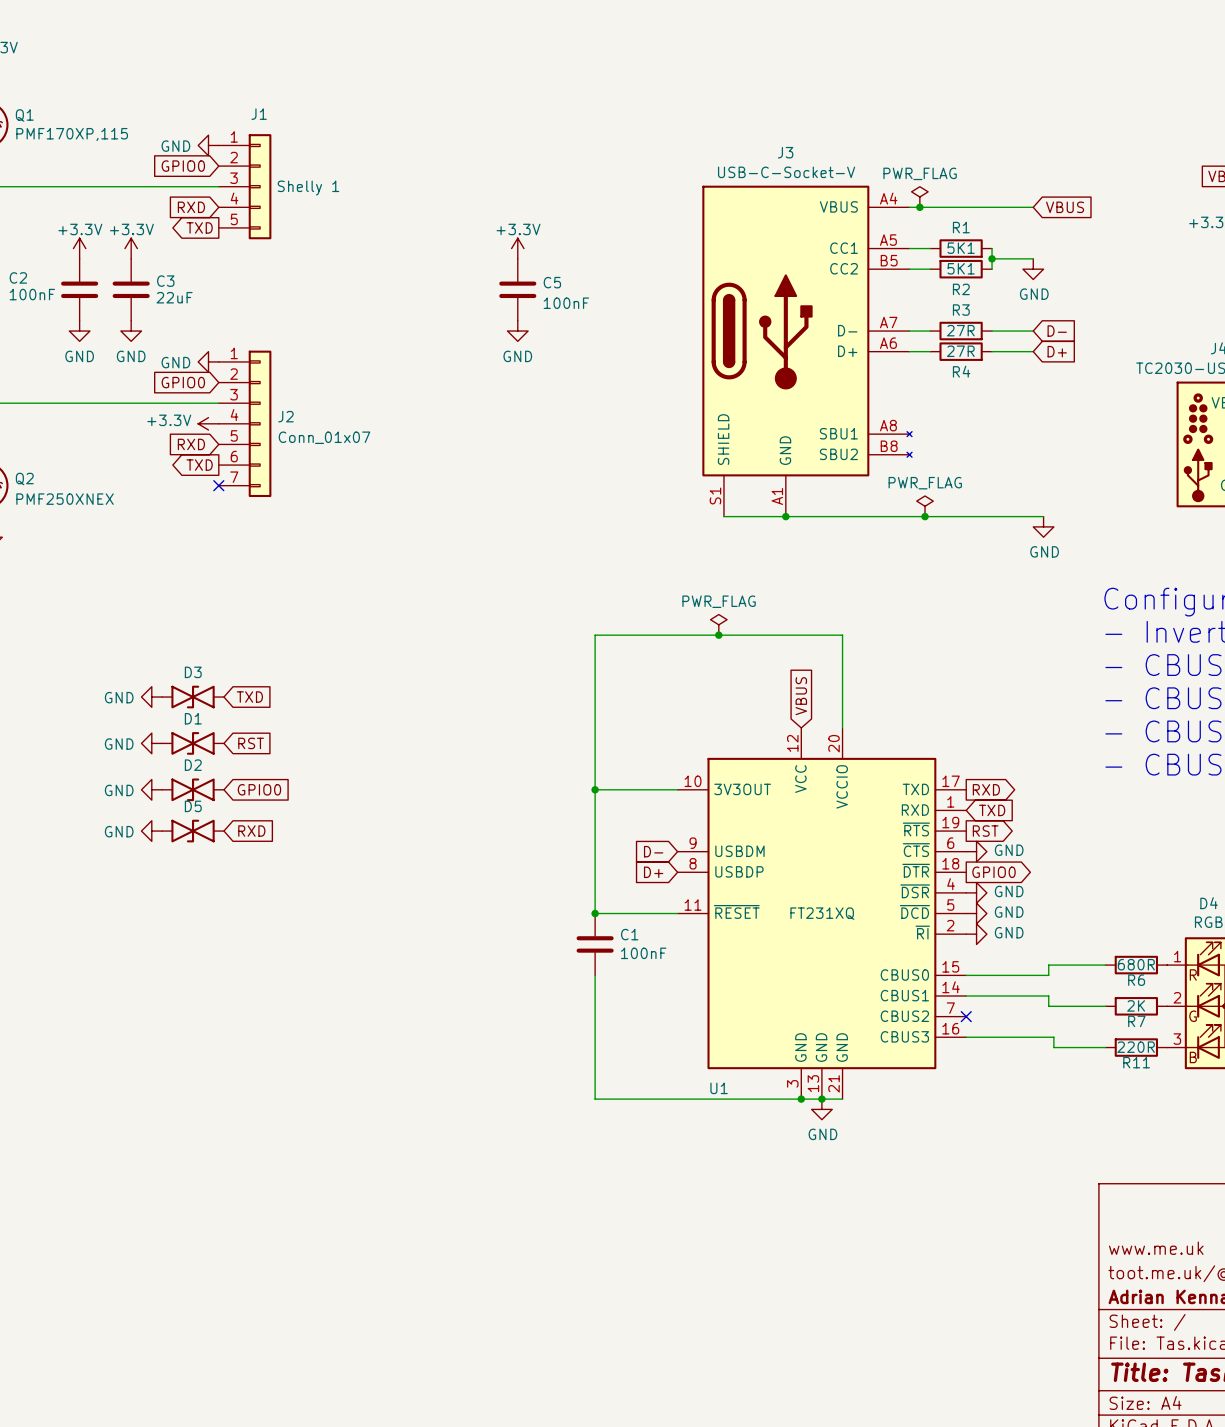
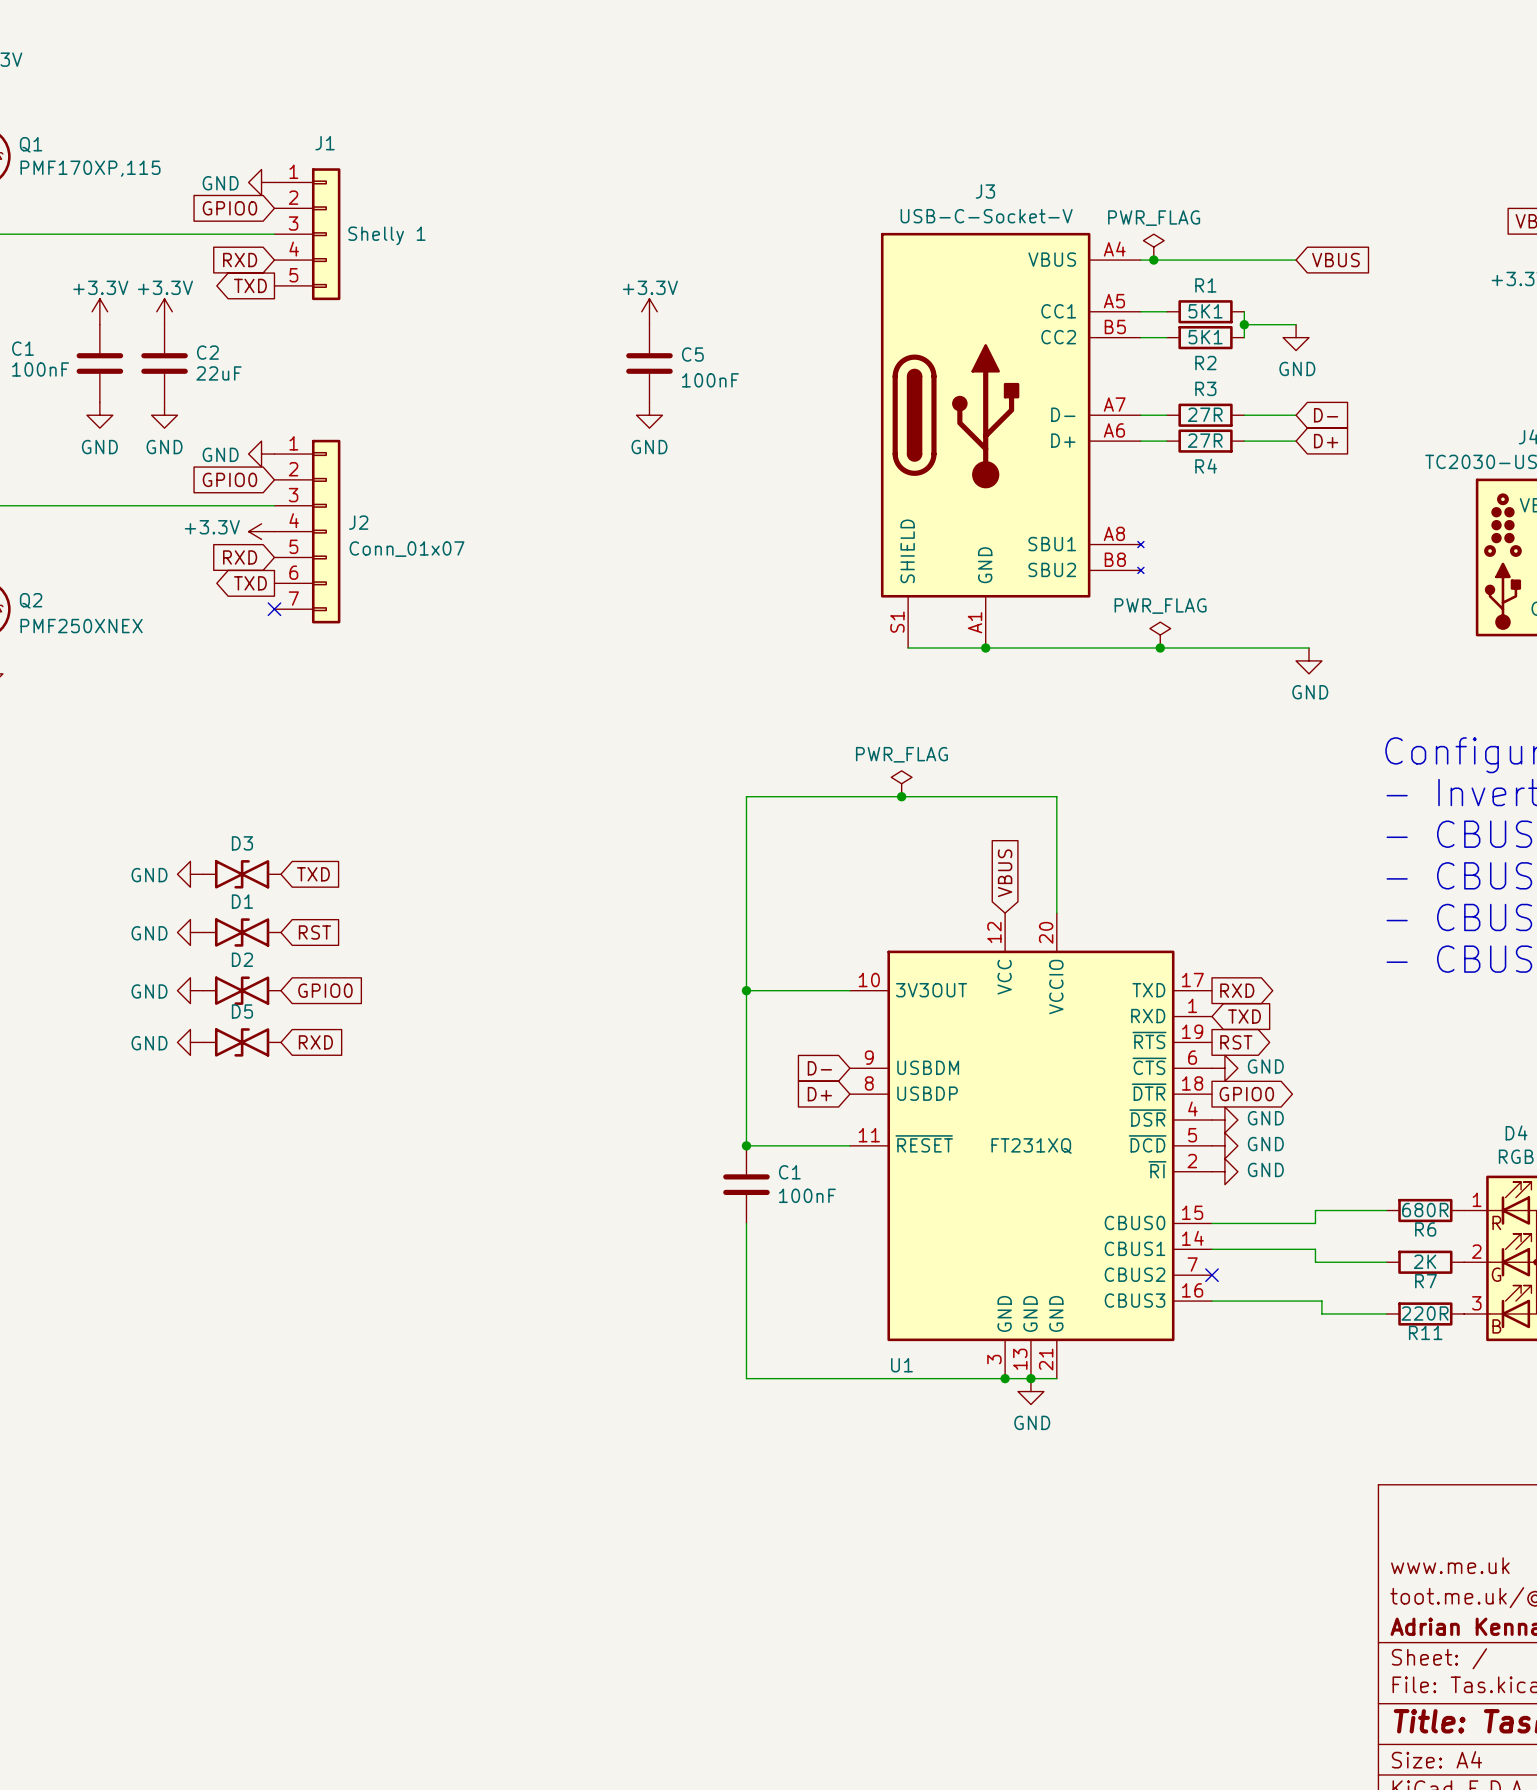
C2 name: C2 (18, 277) -> C1 (23, 348)
C3 name: C3 (165, 281) -> C2 (207, 352)

